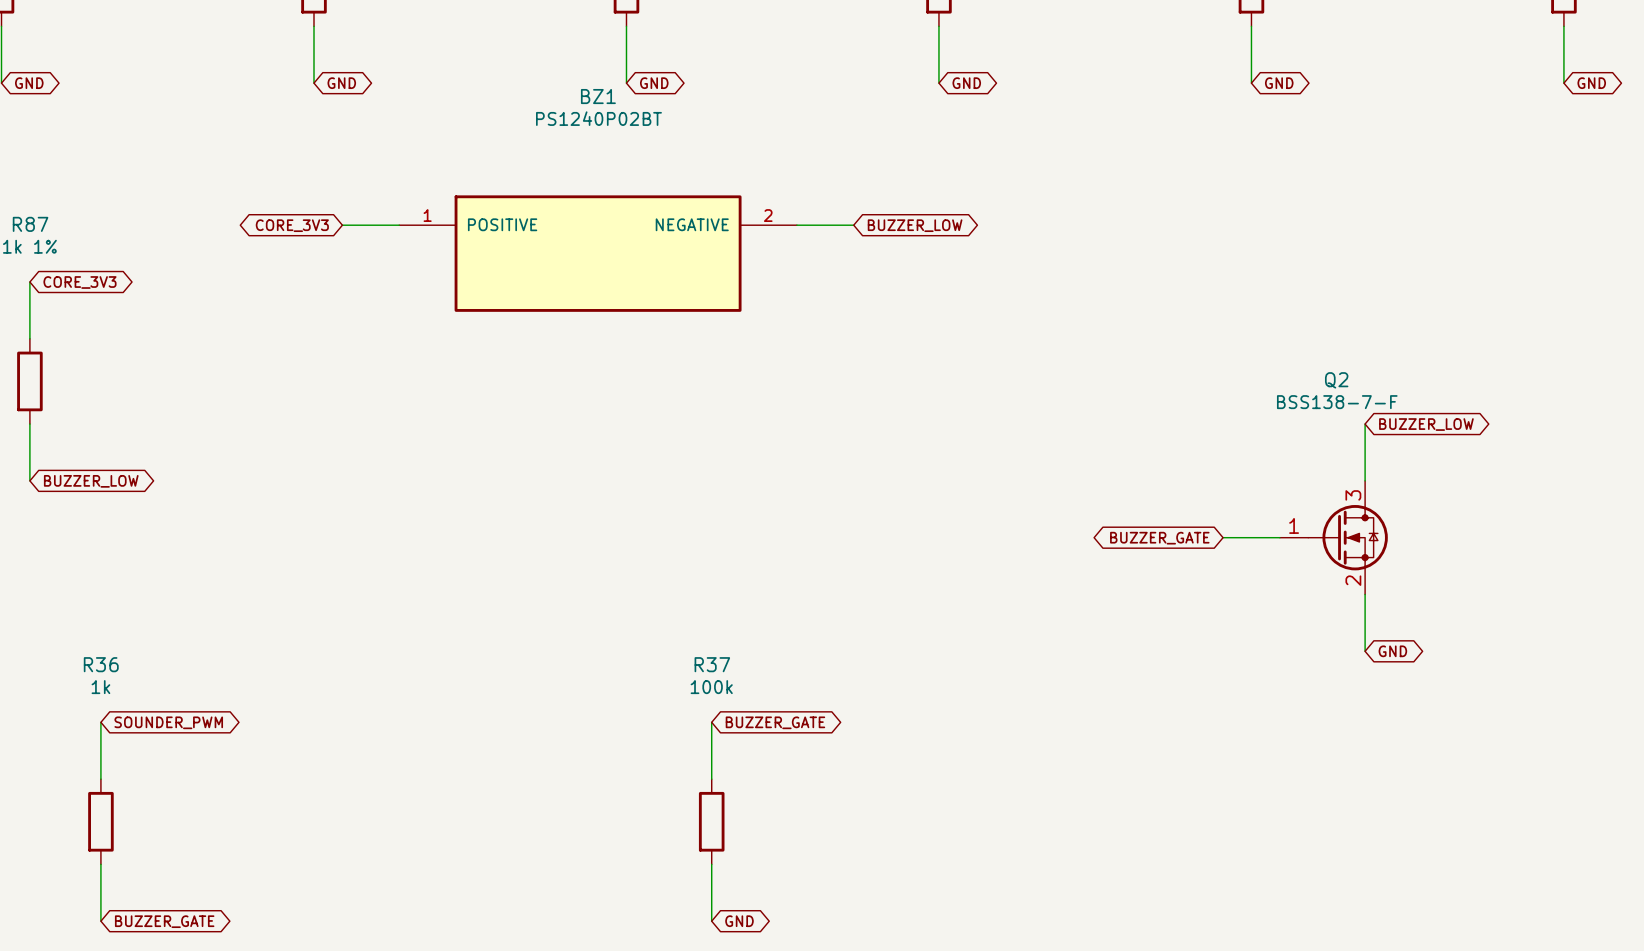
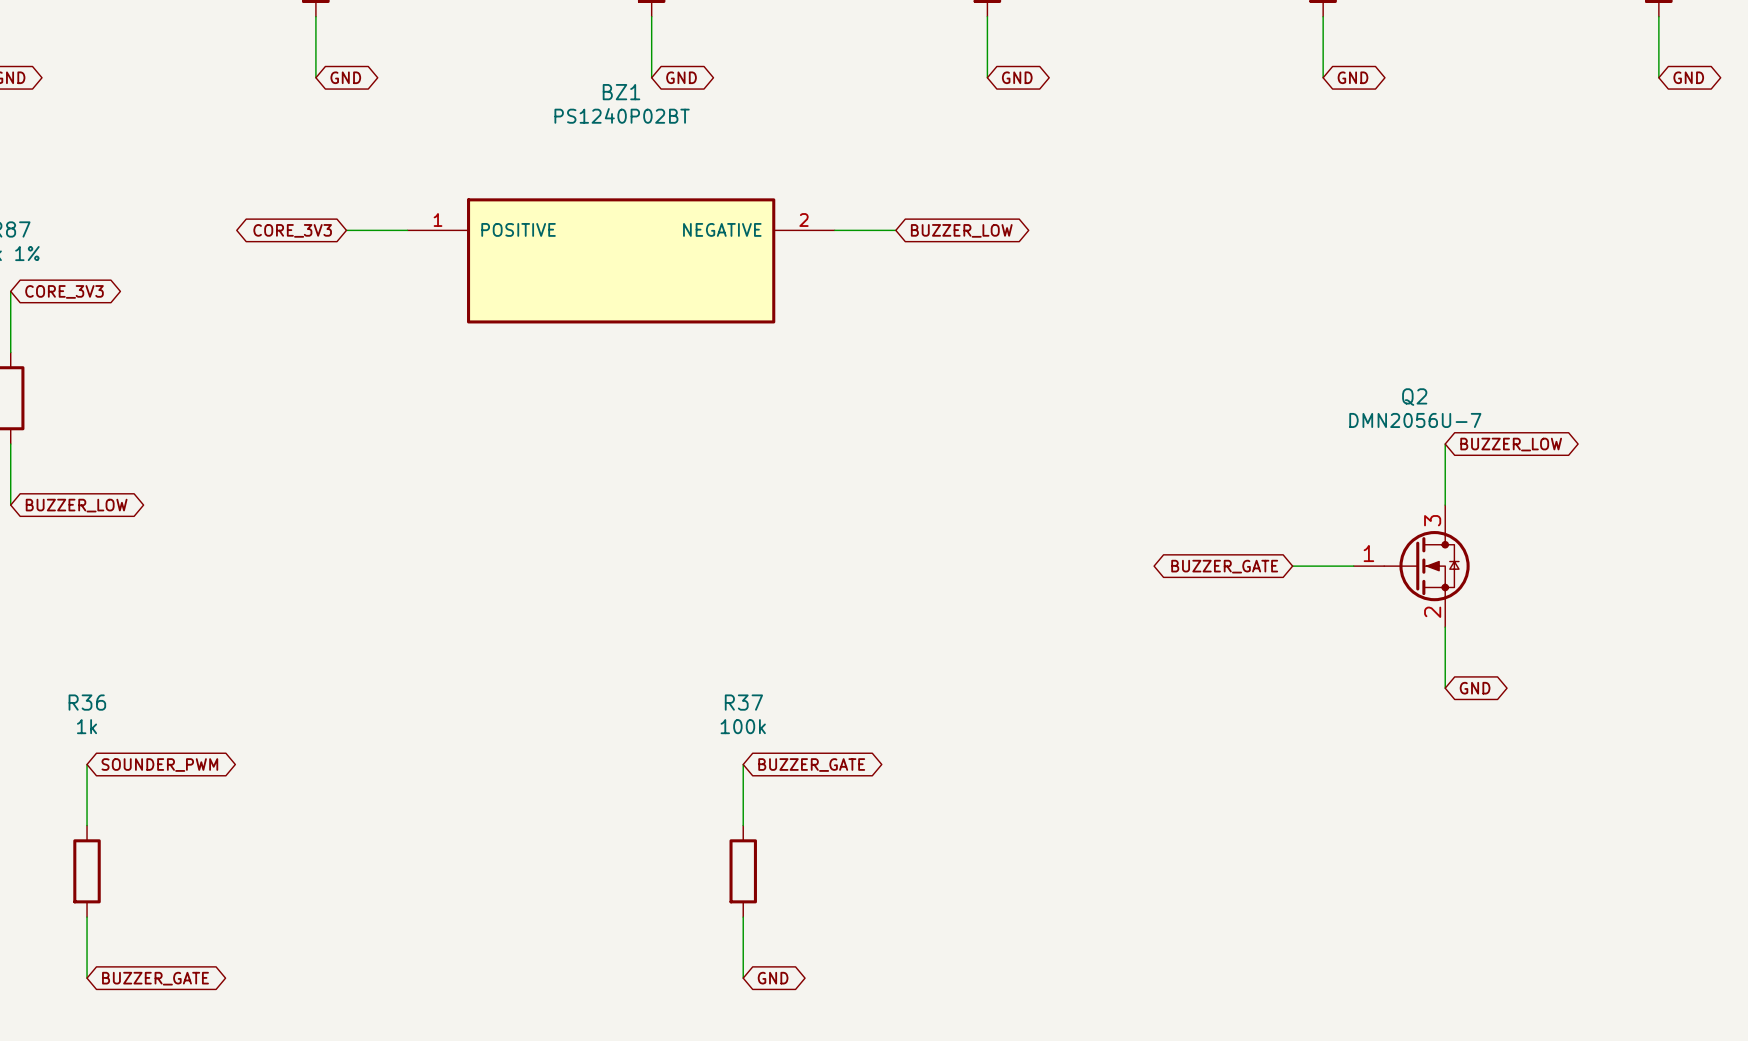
Q2 value: BSS138-7-F (1337, 402) -> DMN2056U-7 (1415, 420)

